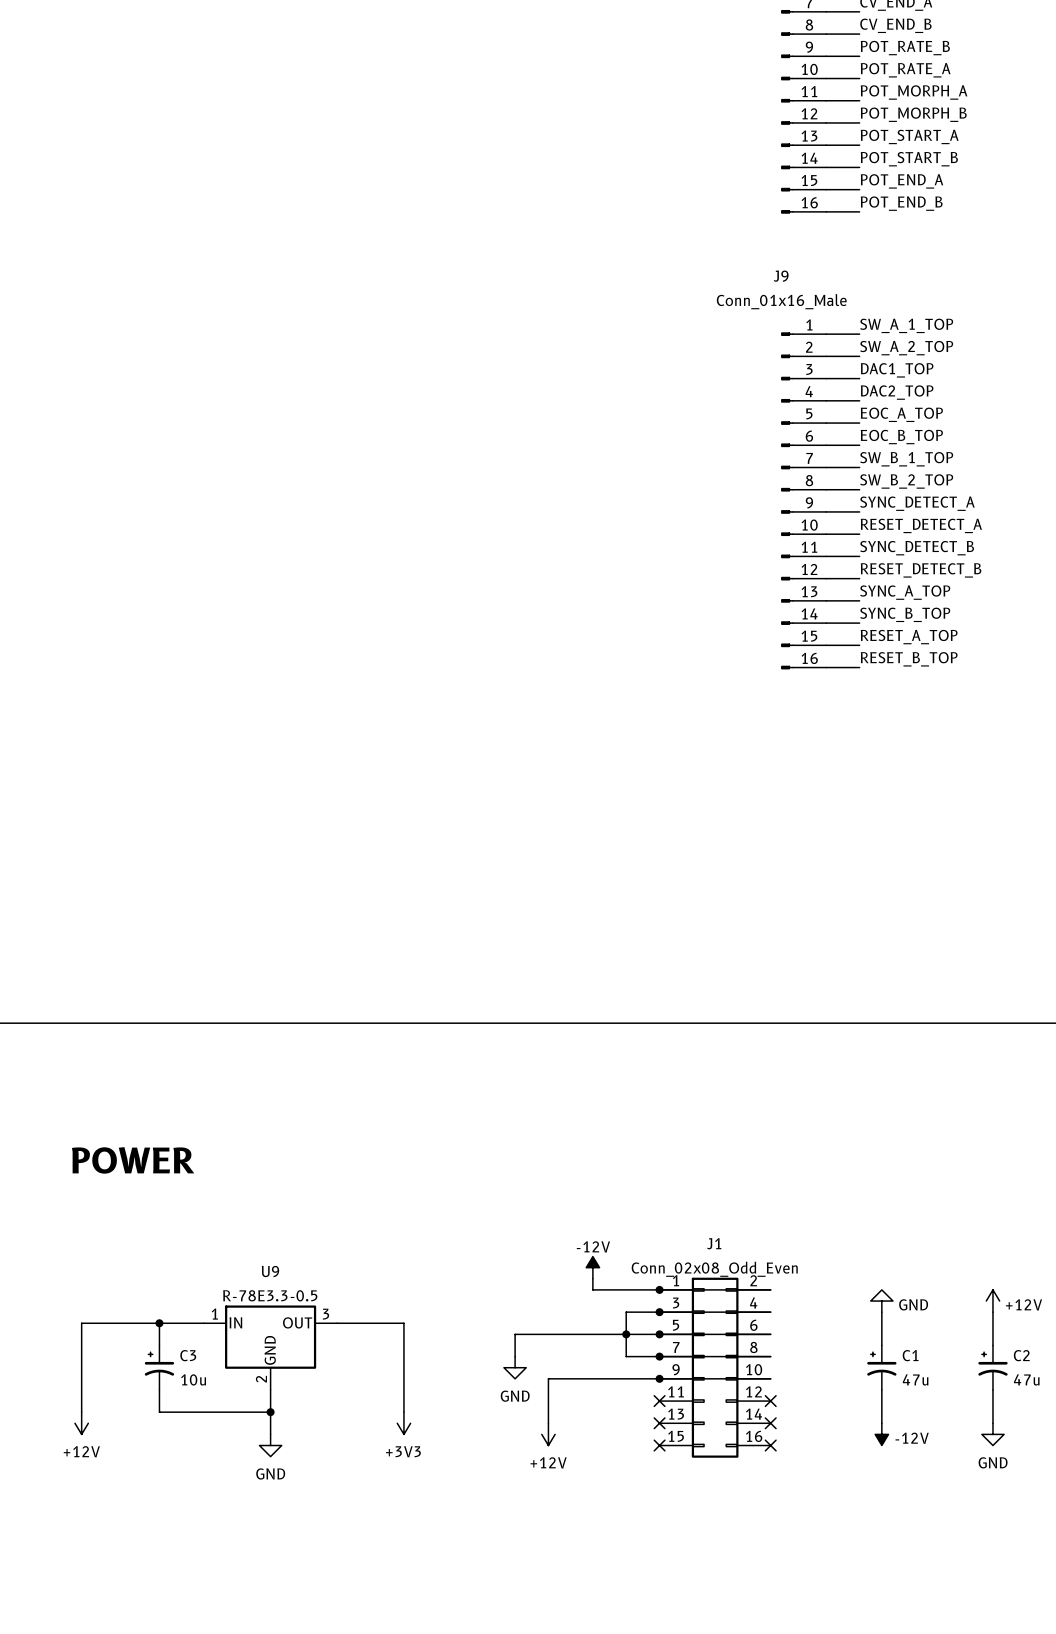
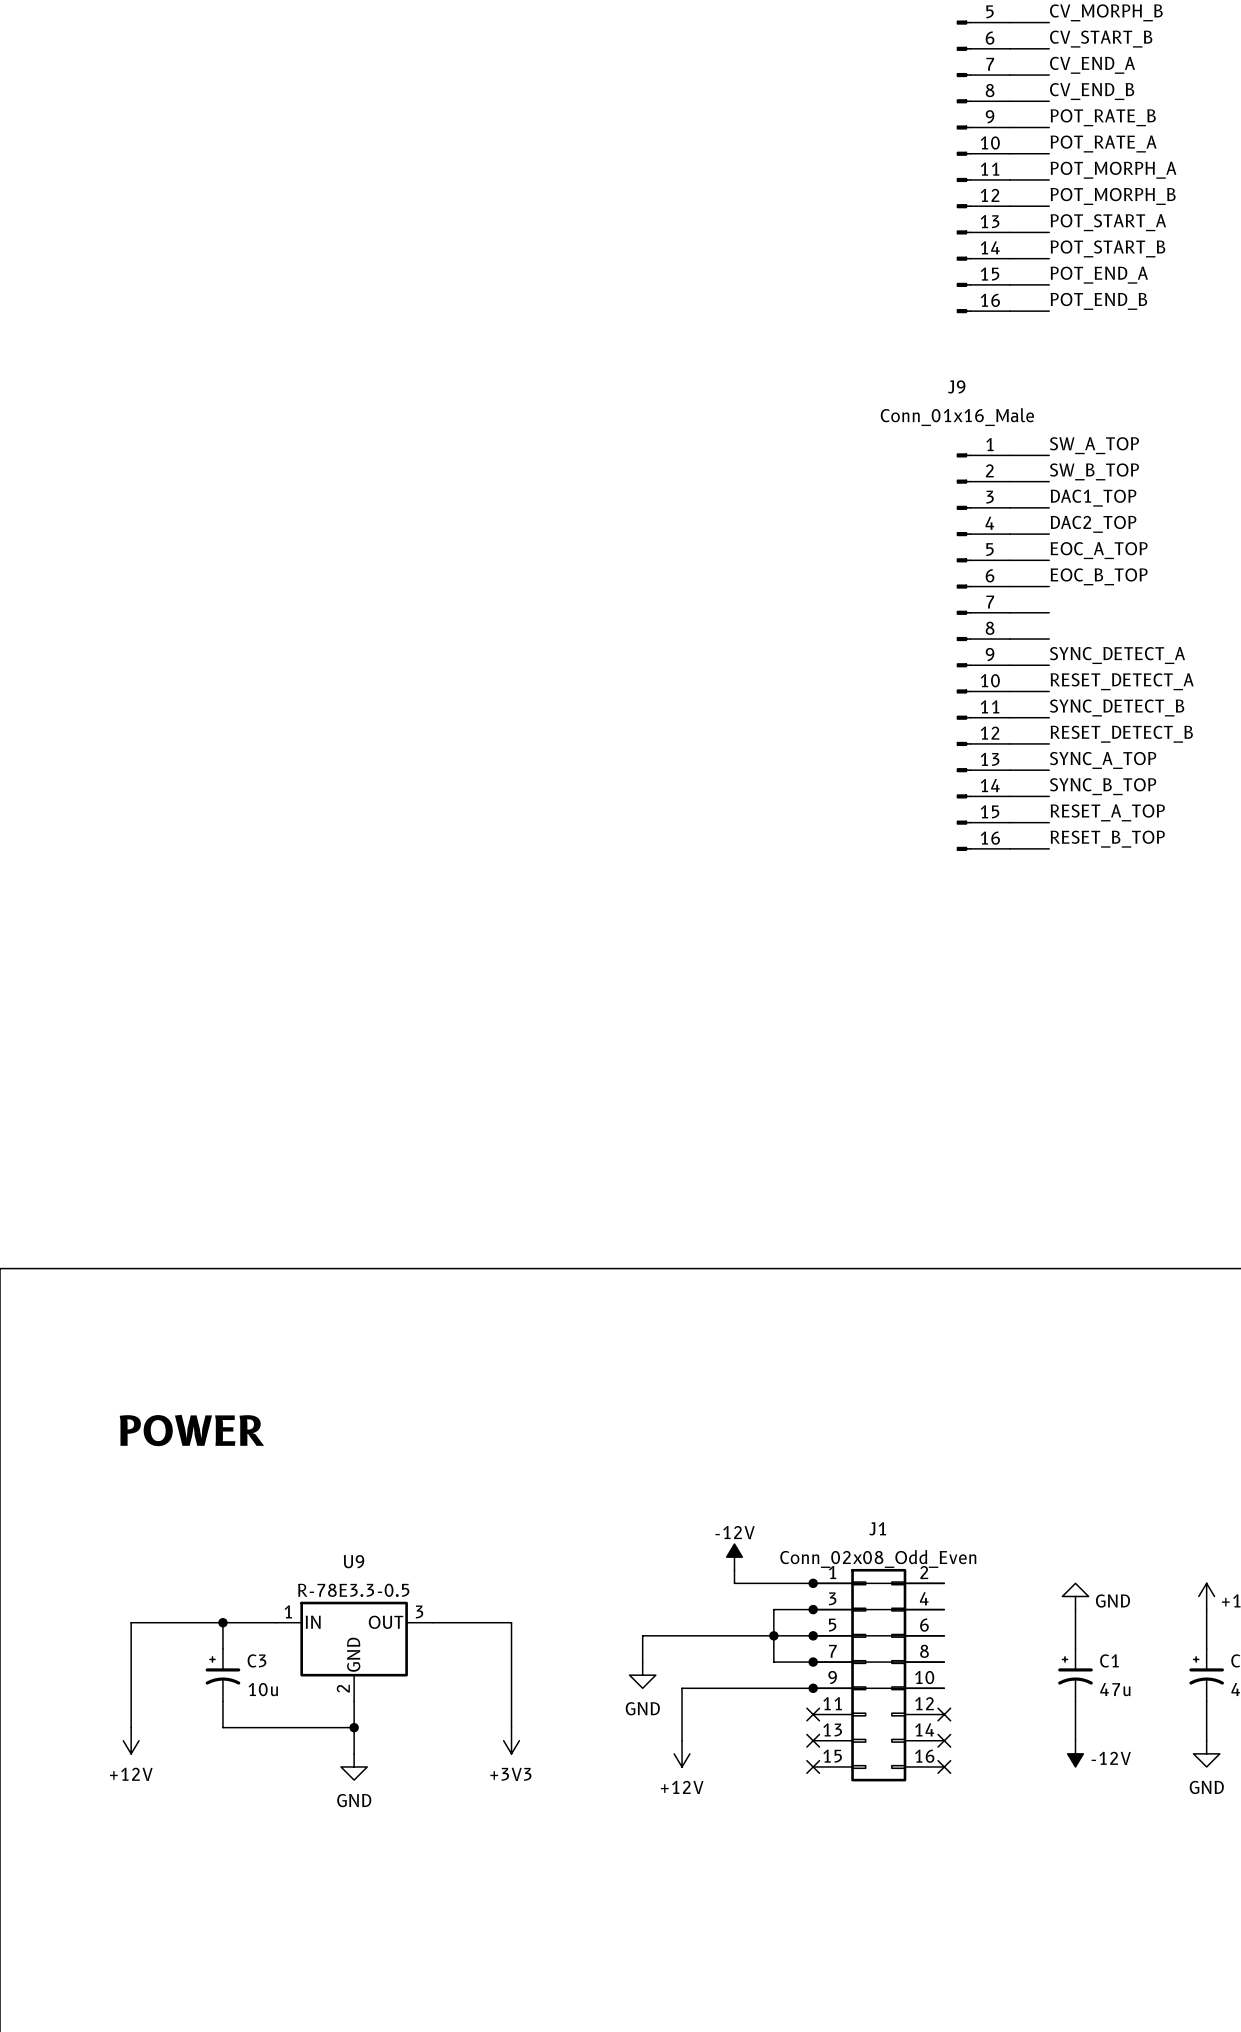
label: SW_A_1_TOP (906, 325) -> SW_A_TOP (1094, 445)
label: SW_A_2_TOP (906, 348) -> SW_B_TOP (1094, 471)
label: SW_B_1_TOP (906, 459) -> none
label: SW_B_2_TOP (906, 481) -> none

